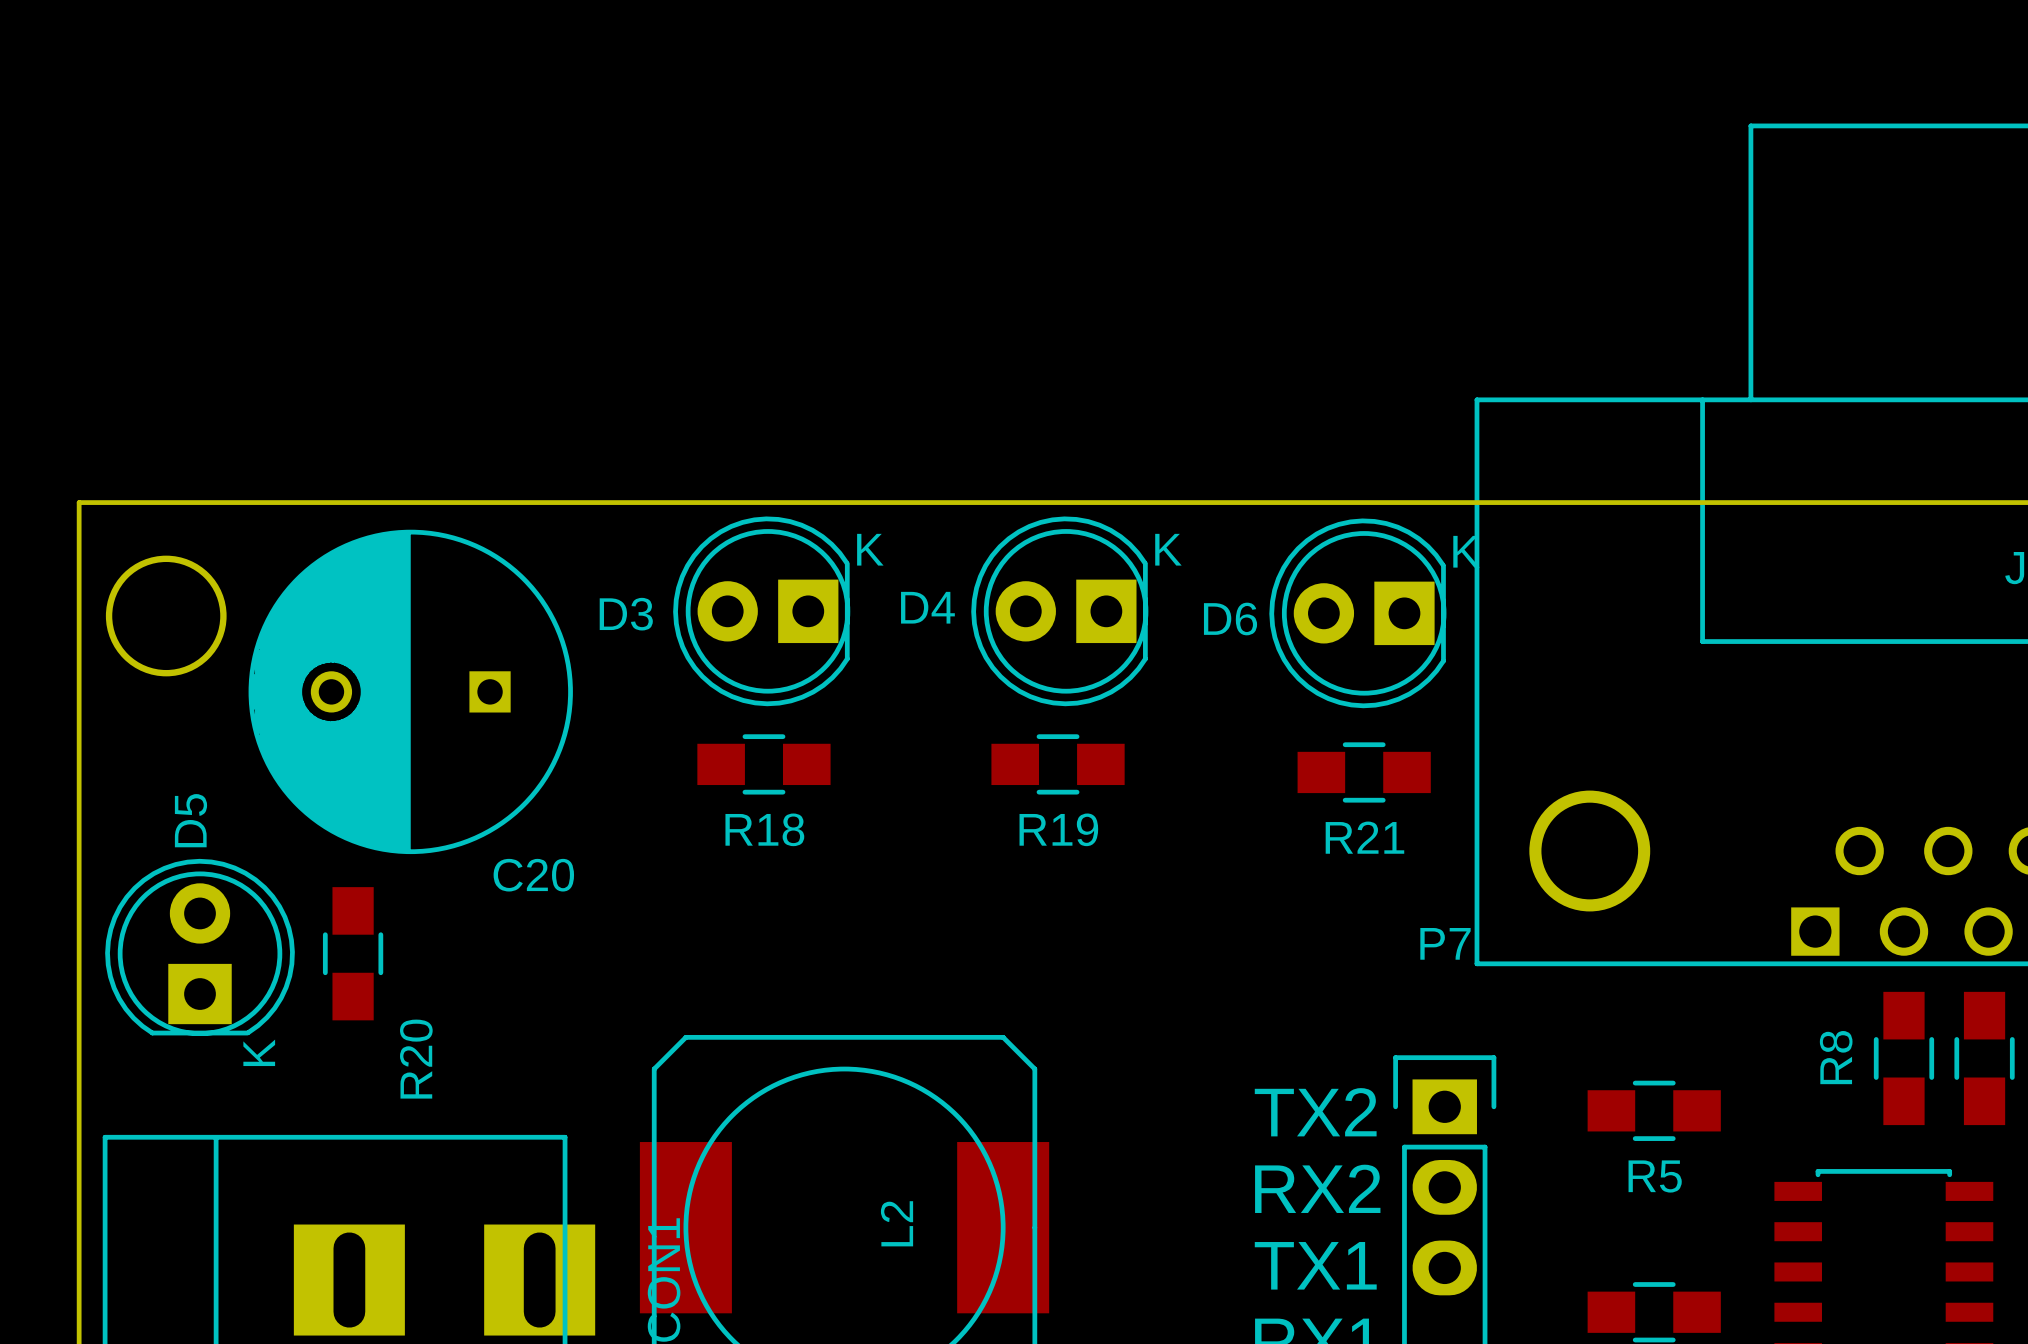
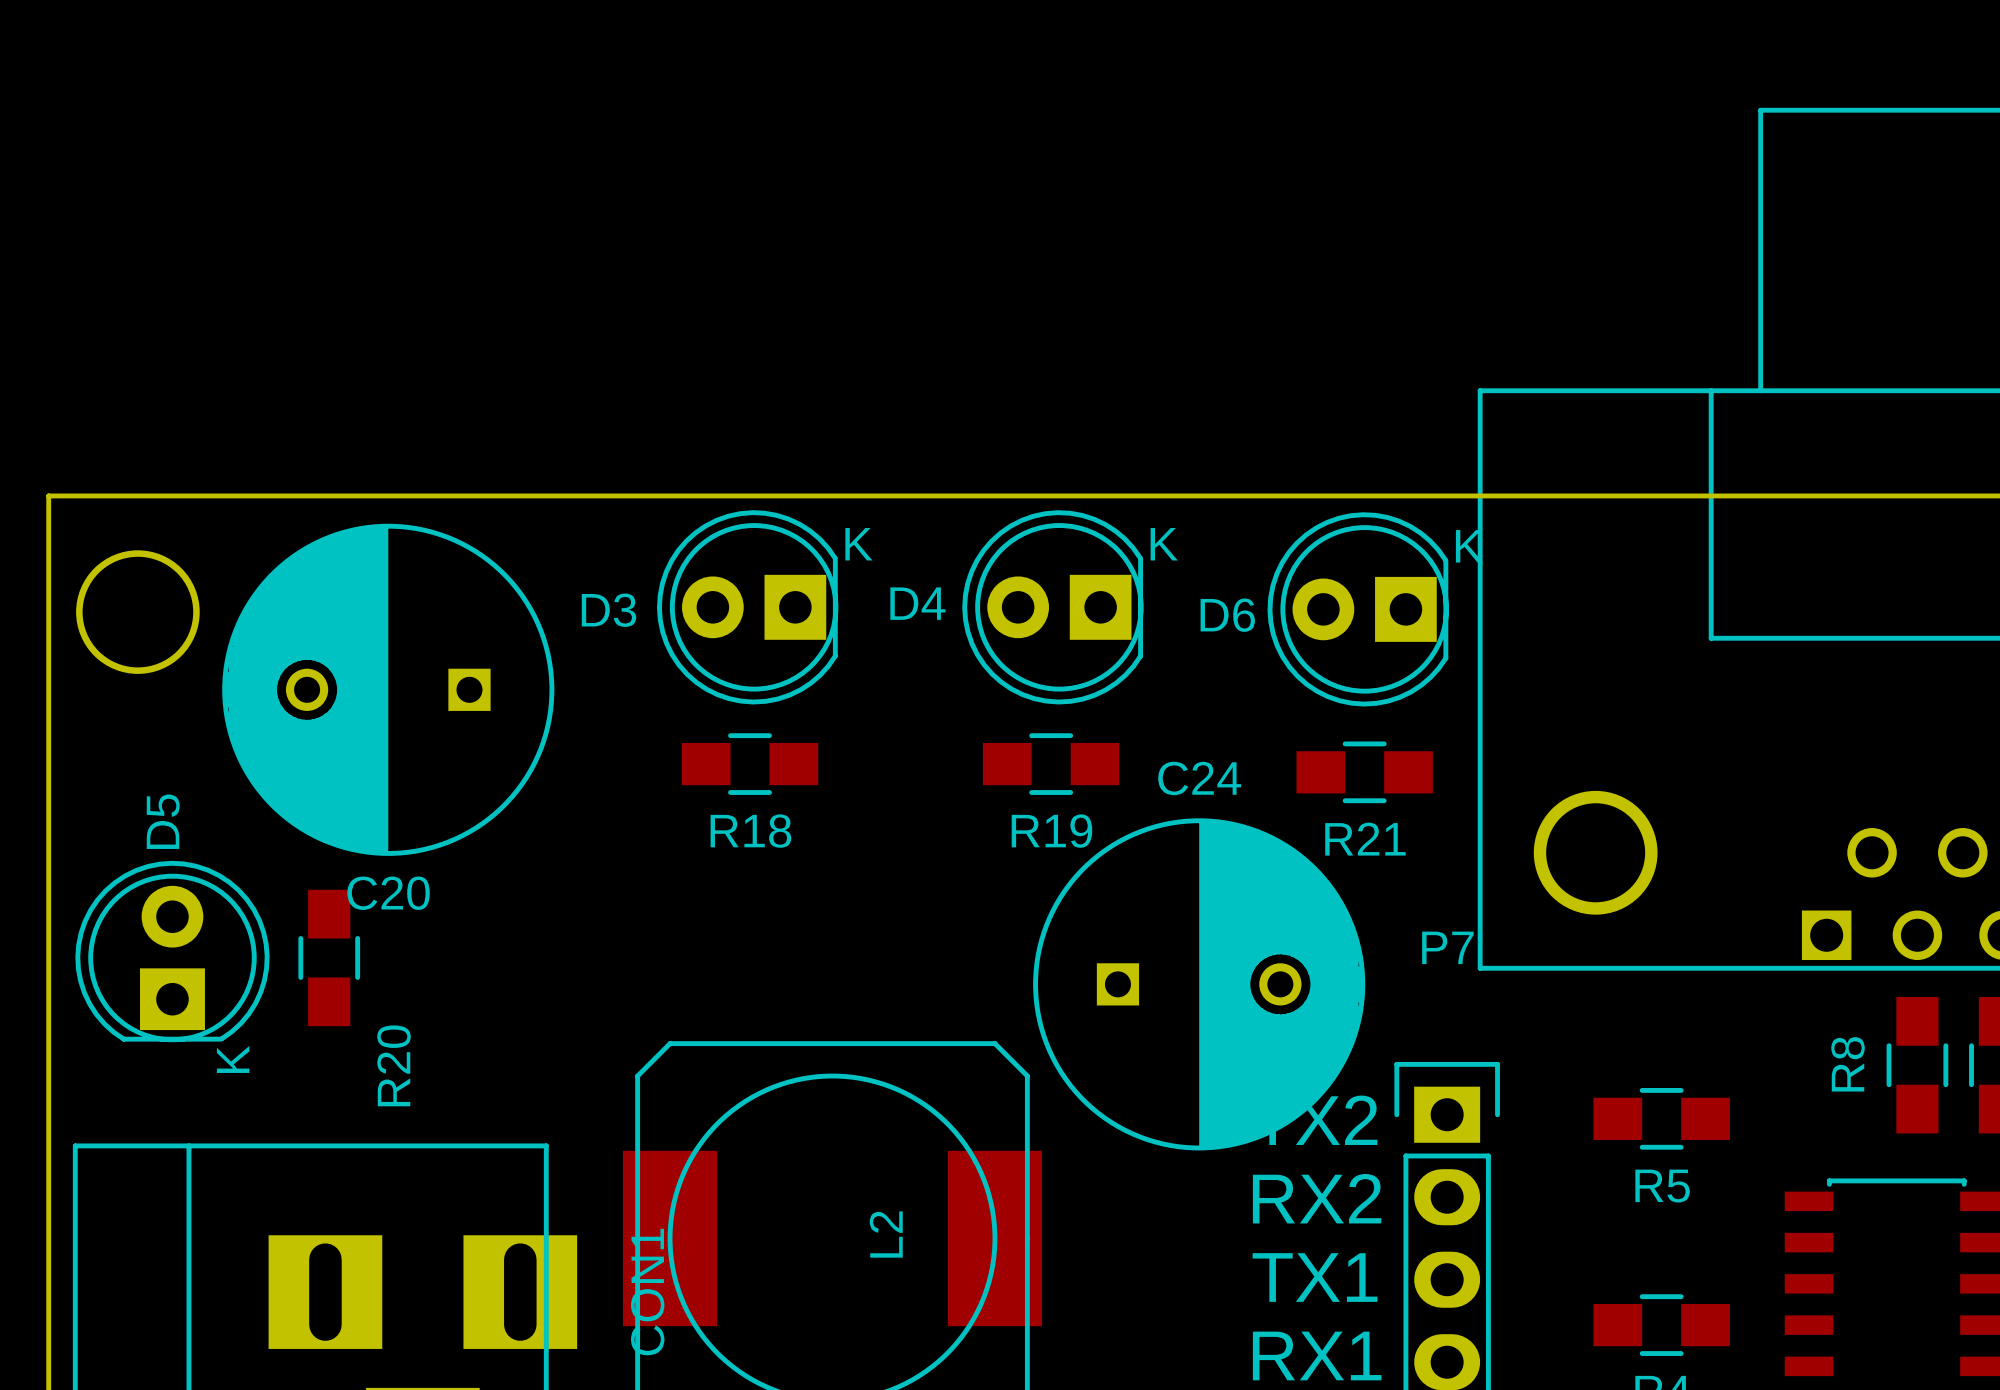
C20 name position: C20 (533, 875) -> C20 (388, 893)
C24: none -> (1199, 984)

